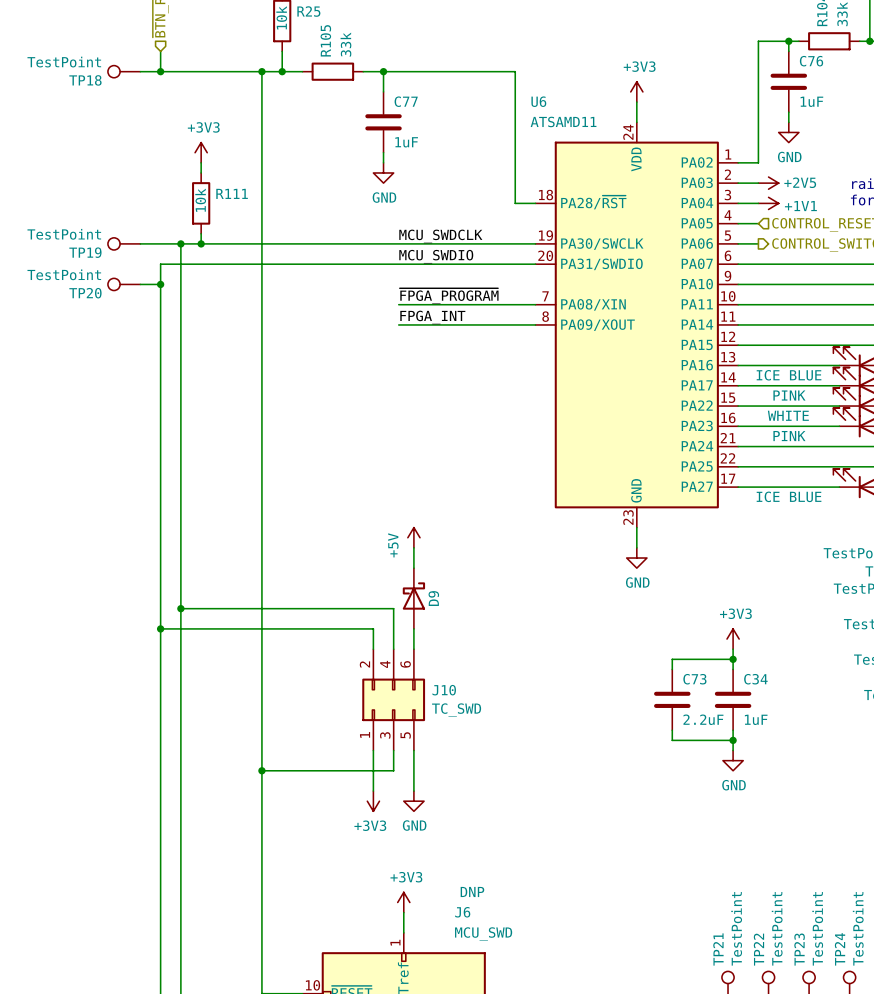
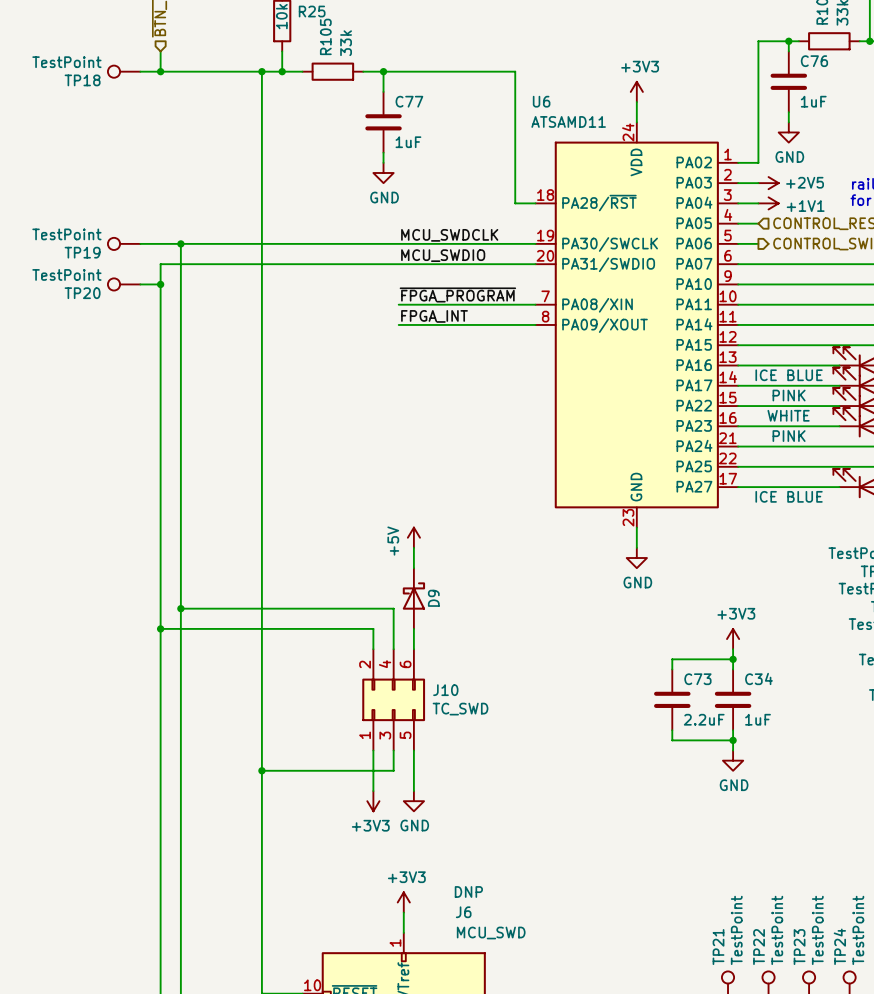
power symbol: +3V3 (201, 152) -> none
wire: (201, 162) (201, 172) -> none
R111: 10k (201, 203) -> none
wire: (201, 233) (201, 243) -> none
junction: (201, 243) -> none

